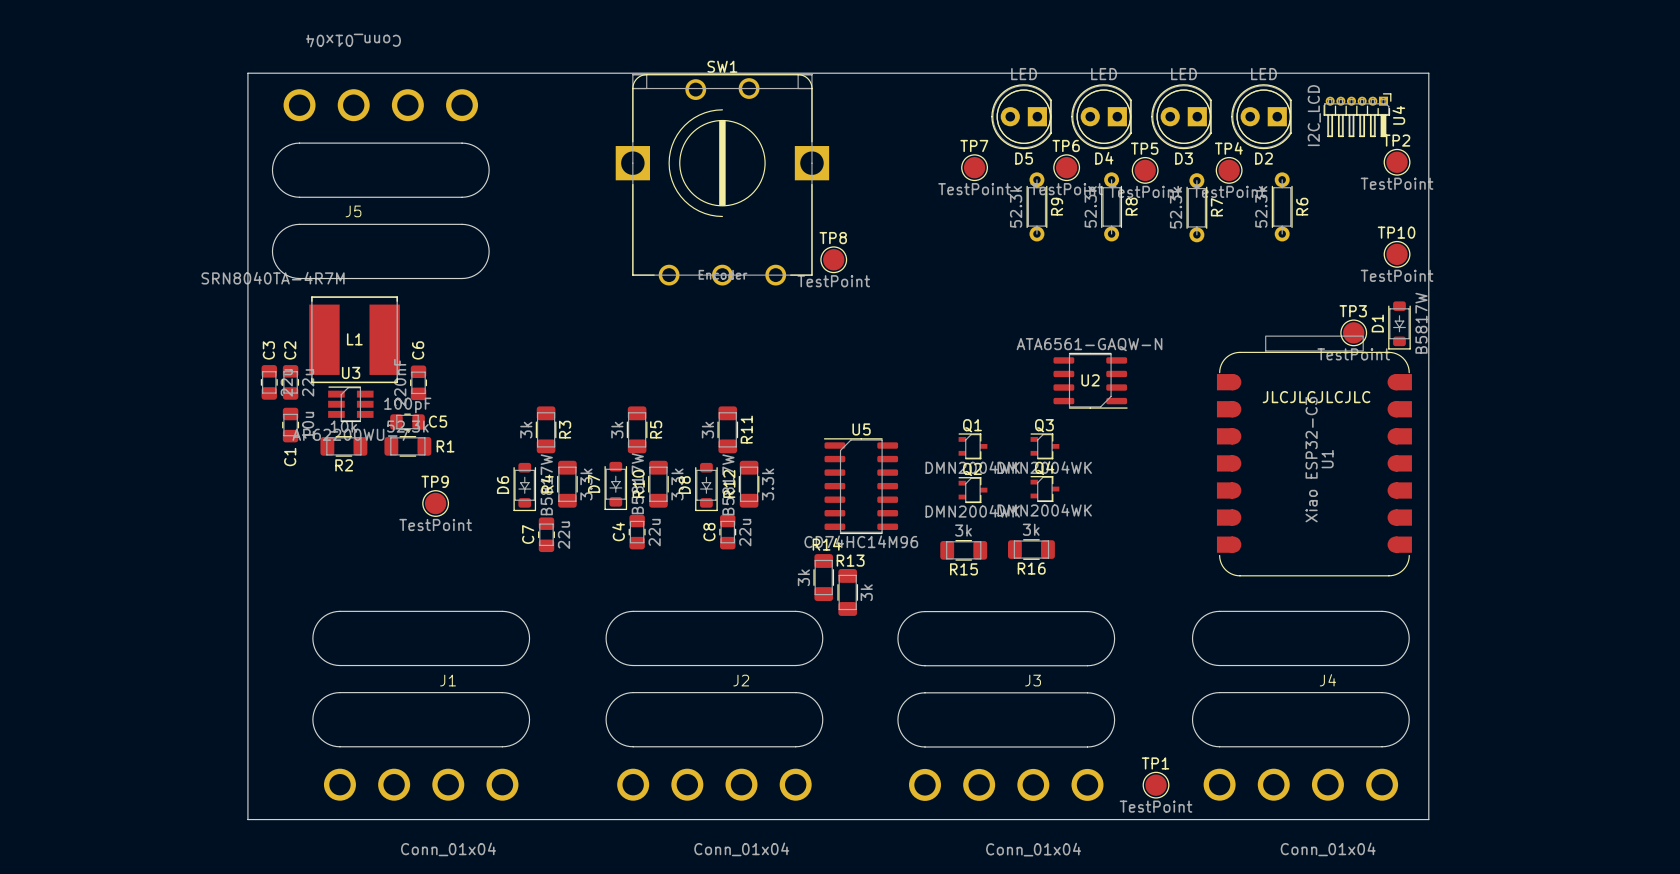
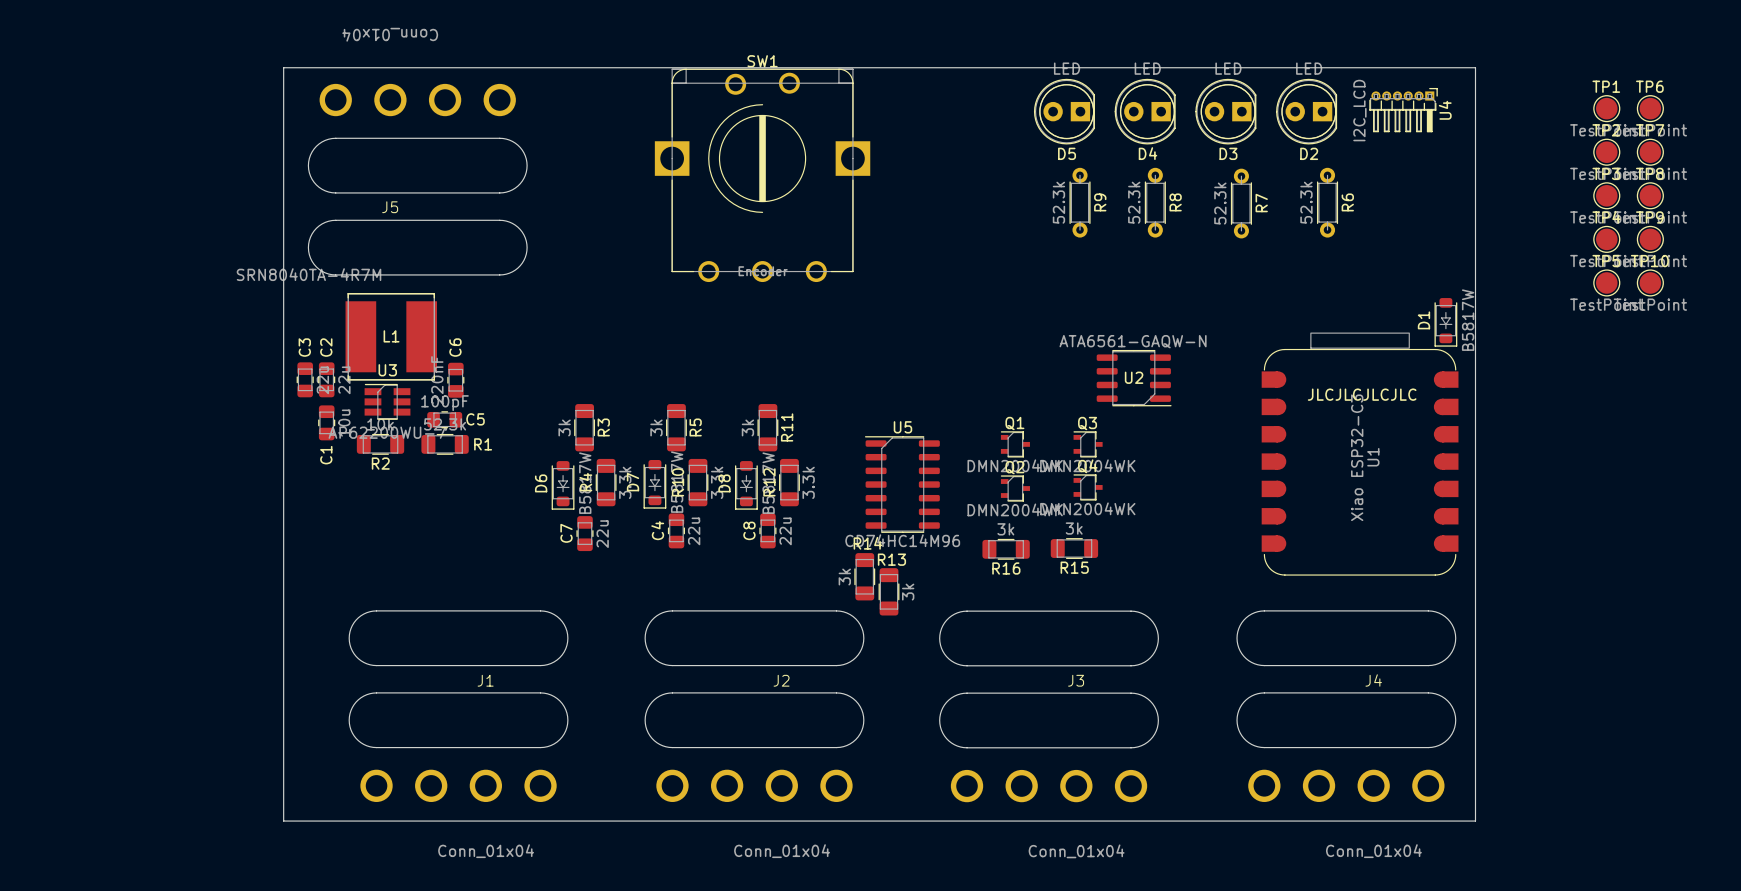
TP2 position: (1397, 162) -> (1606, 152)
TP7 position: (974, 167) -> (1650, 152)
TP6 position: (1066, 167) -> (1650, 108)
TP5 position: (1145, 170) -> (1606, 282)
TP4 position: (1229, 170) -> (1606, 239)
TP10 position: (1397, 254) -> (1650, 282)
TP8 position: (833, 259) -> (1650, 195)
TP3 position: (1353, 332) -> (1606, 195)
TP9 position: (435, 503) -> (1650, 239)
R16 name: R16 (1031, 568) -> R15 (1074, 567)
R15 name: R15 (963, 569) -> R16 (1006, 568)
TP1 position: (1156, 785) -> (1606, 108)

